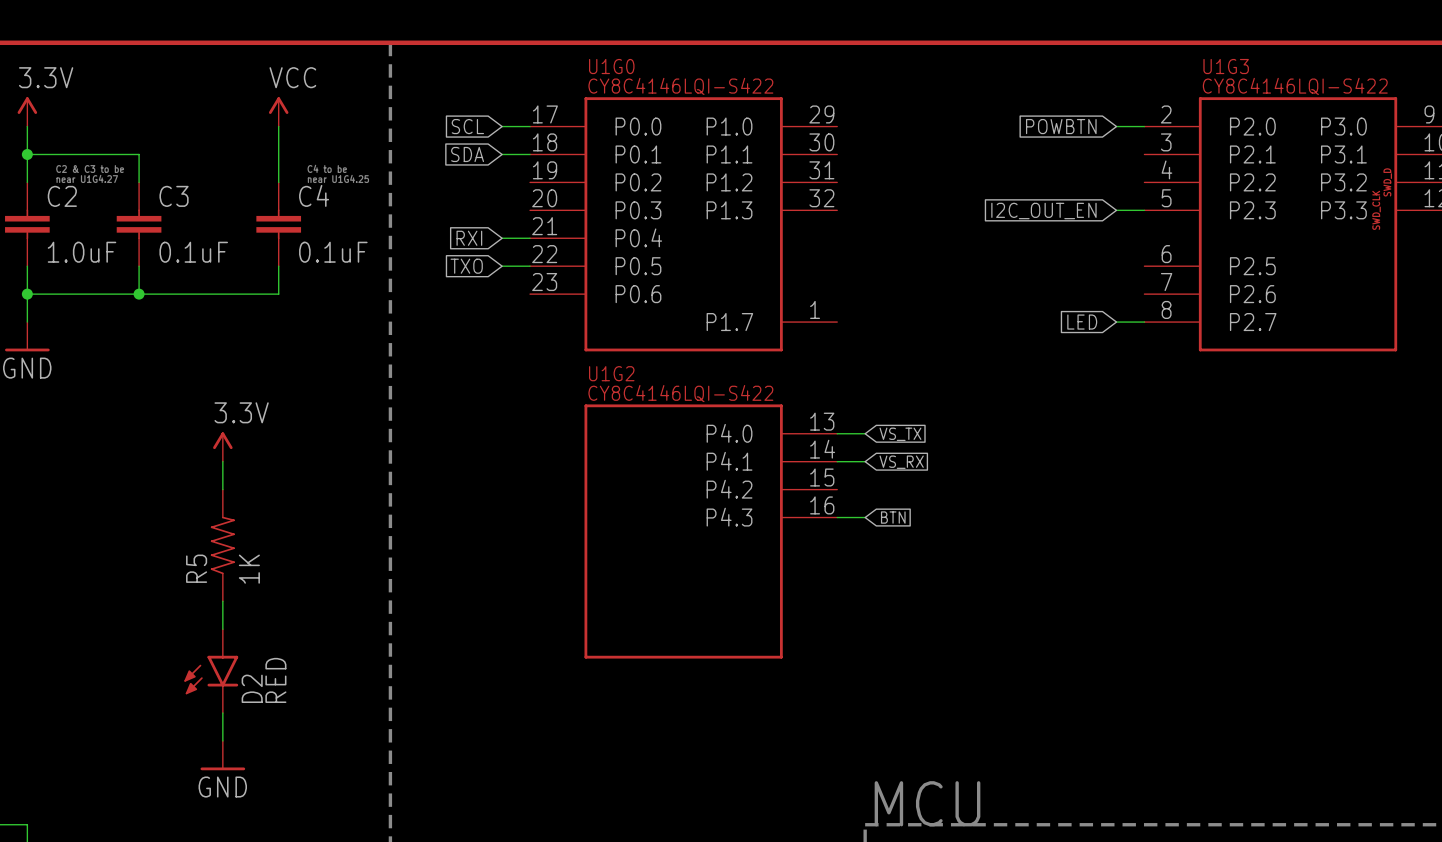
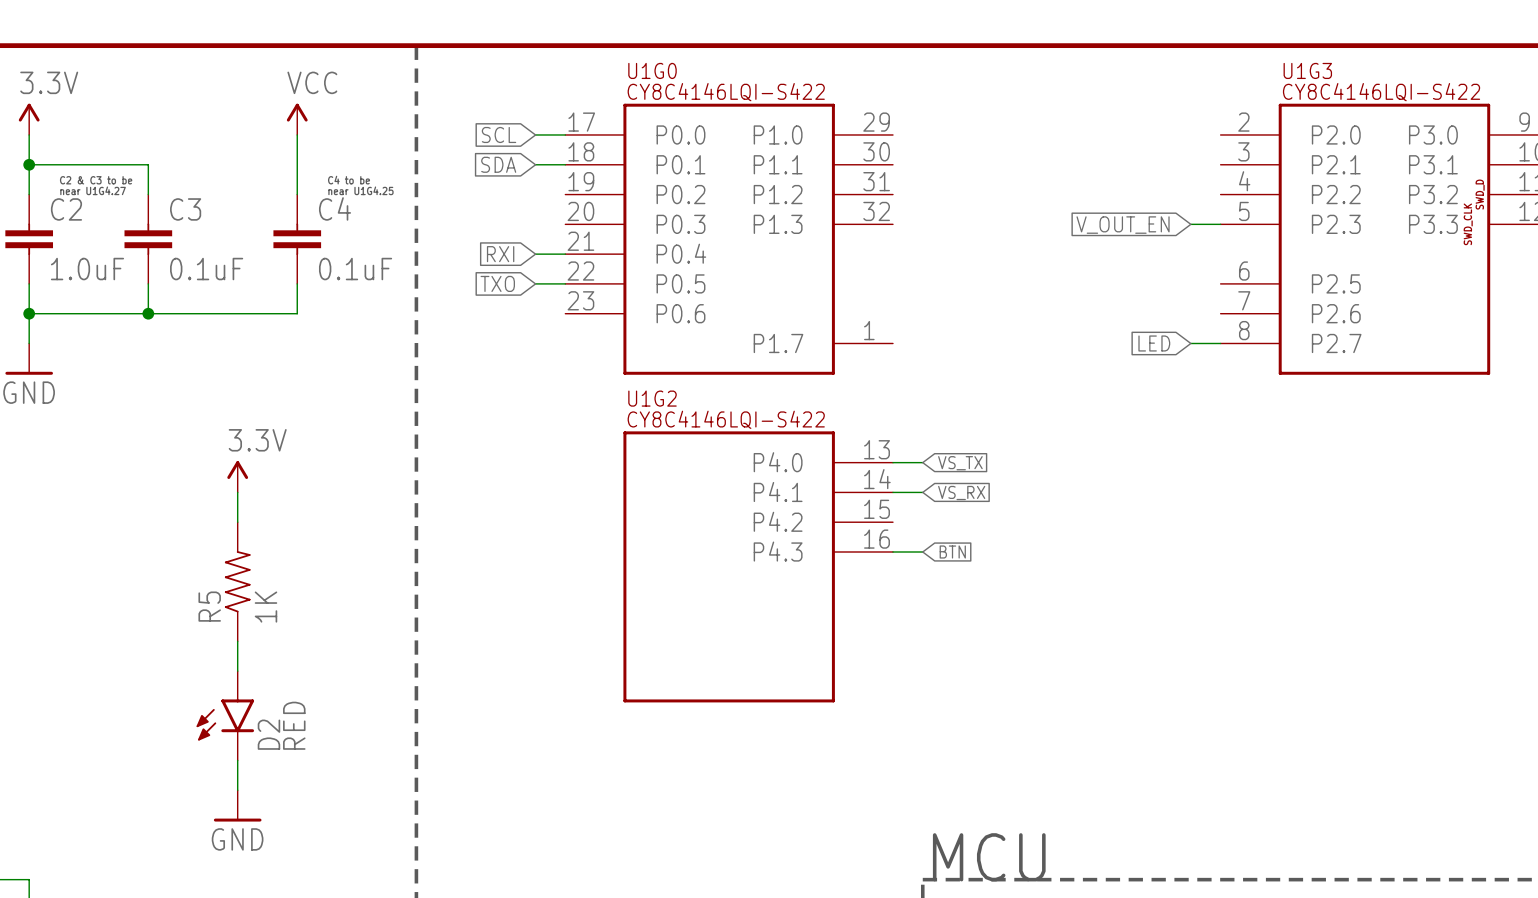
global label: POWBTN (1061, 126) -> none
wire: (1116, 126) (1144, 126) -> none
global label: I2C_OUT_EN (1043, 211) -> V_OUT_EN (1123, 225)

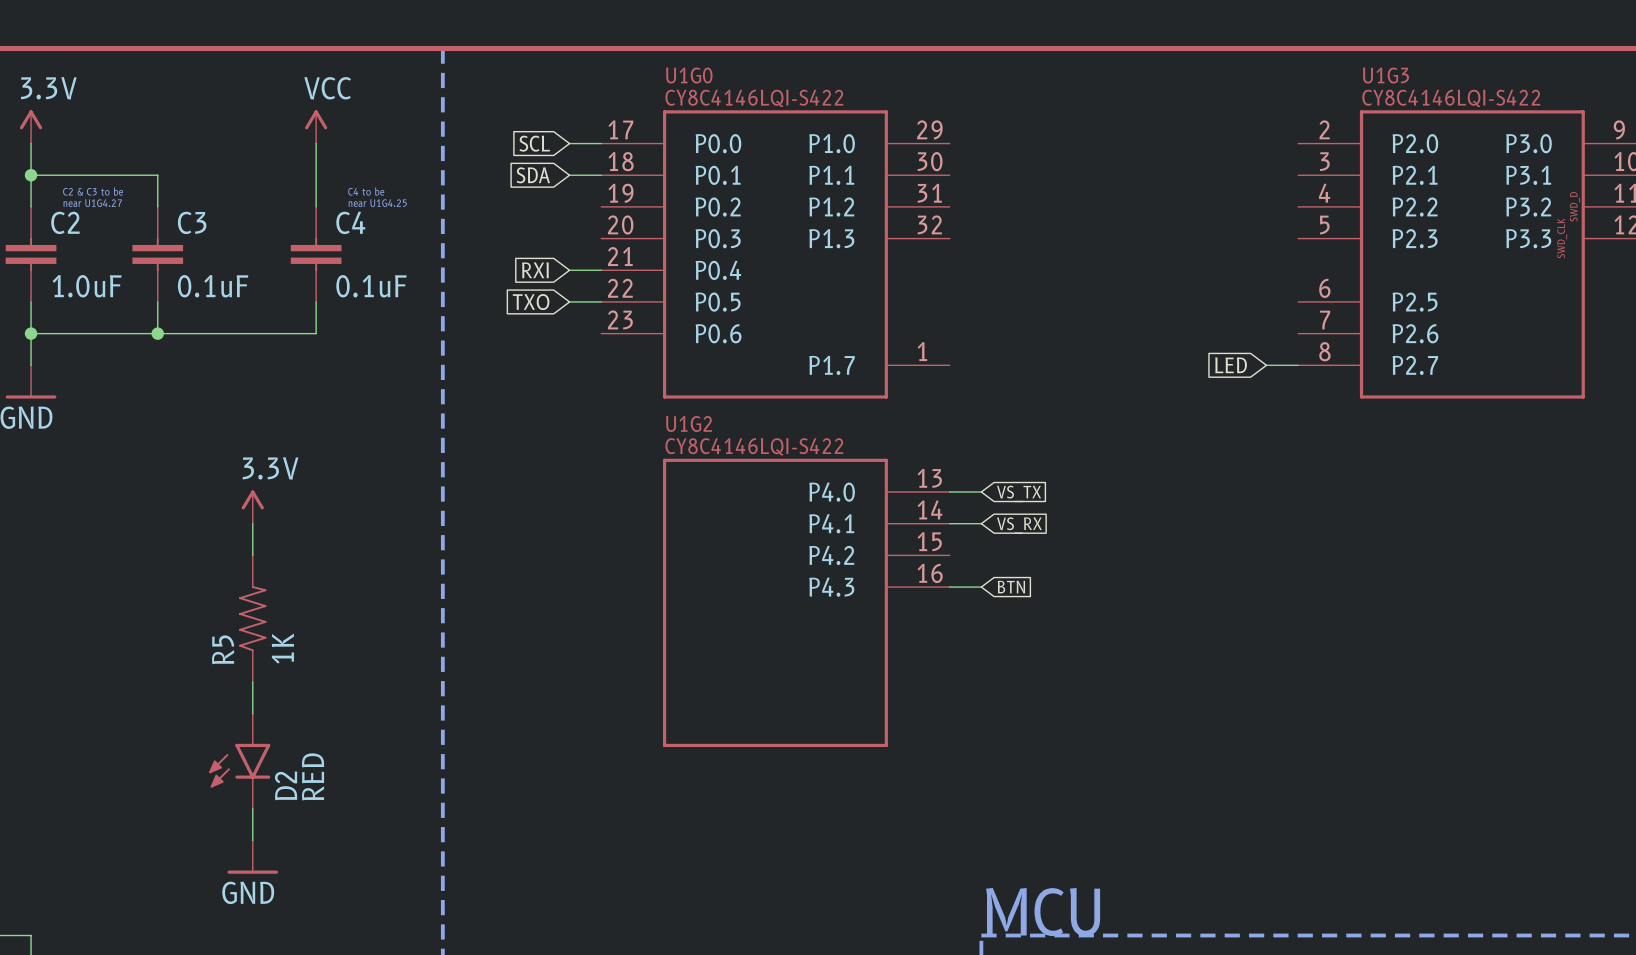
wire: (1190, 224) (1220, 224) -> none
global label: V_OUT_EN (1123, 225) -> none

